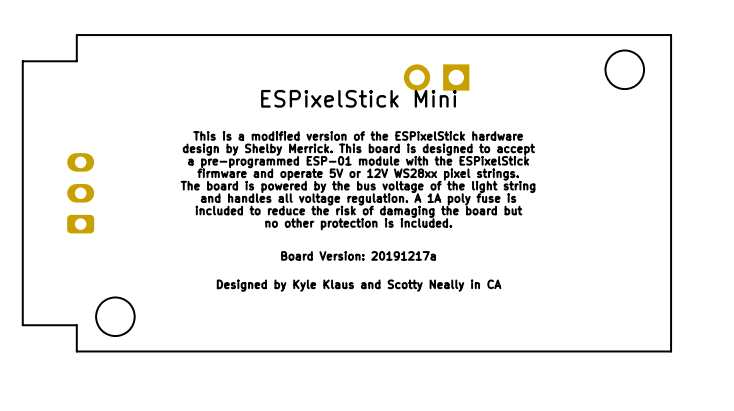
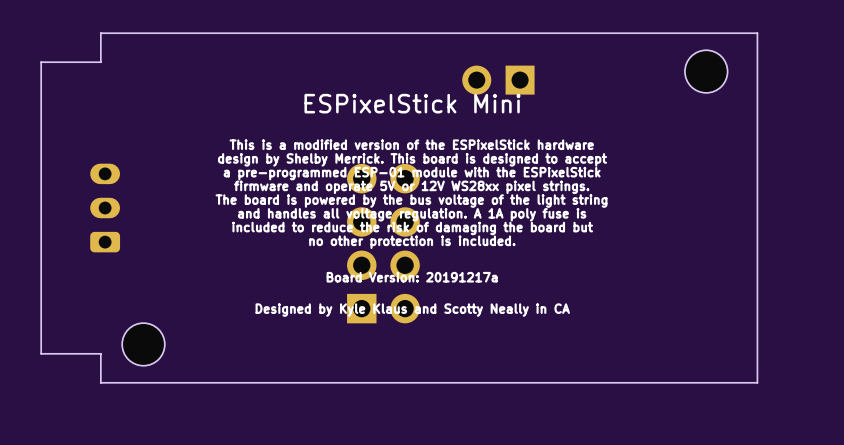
part: none -> (383, 243)

